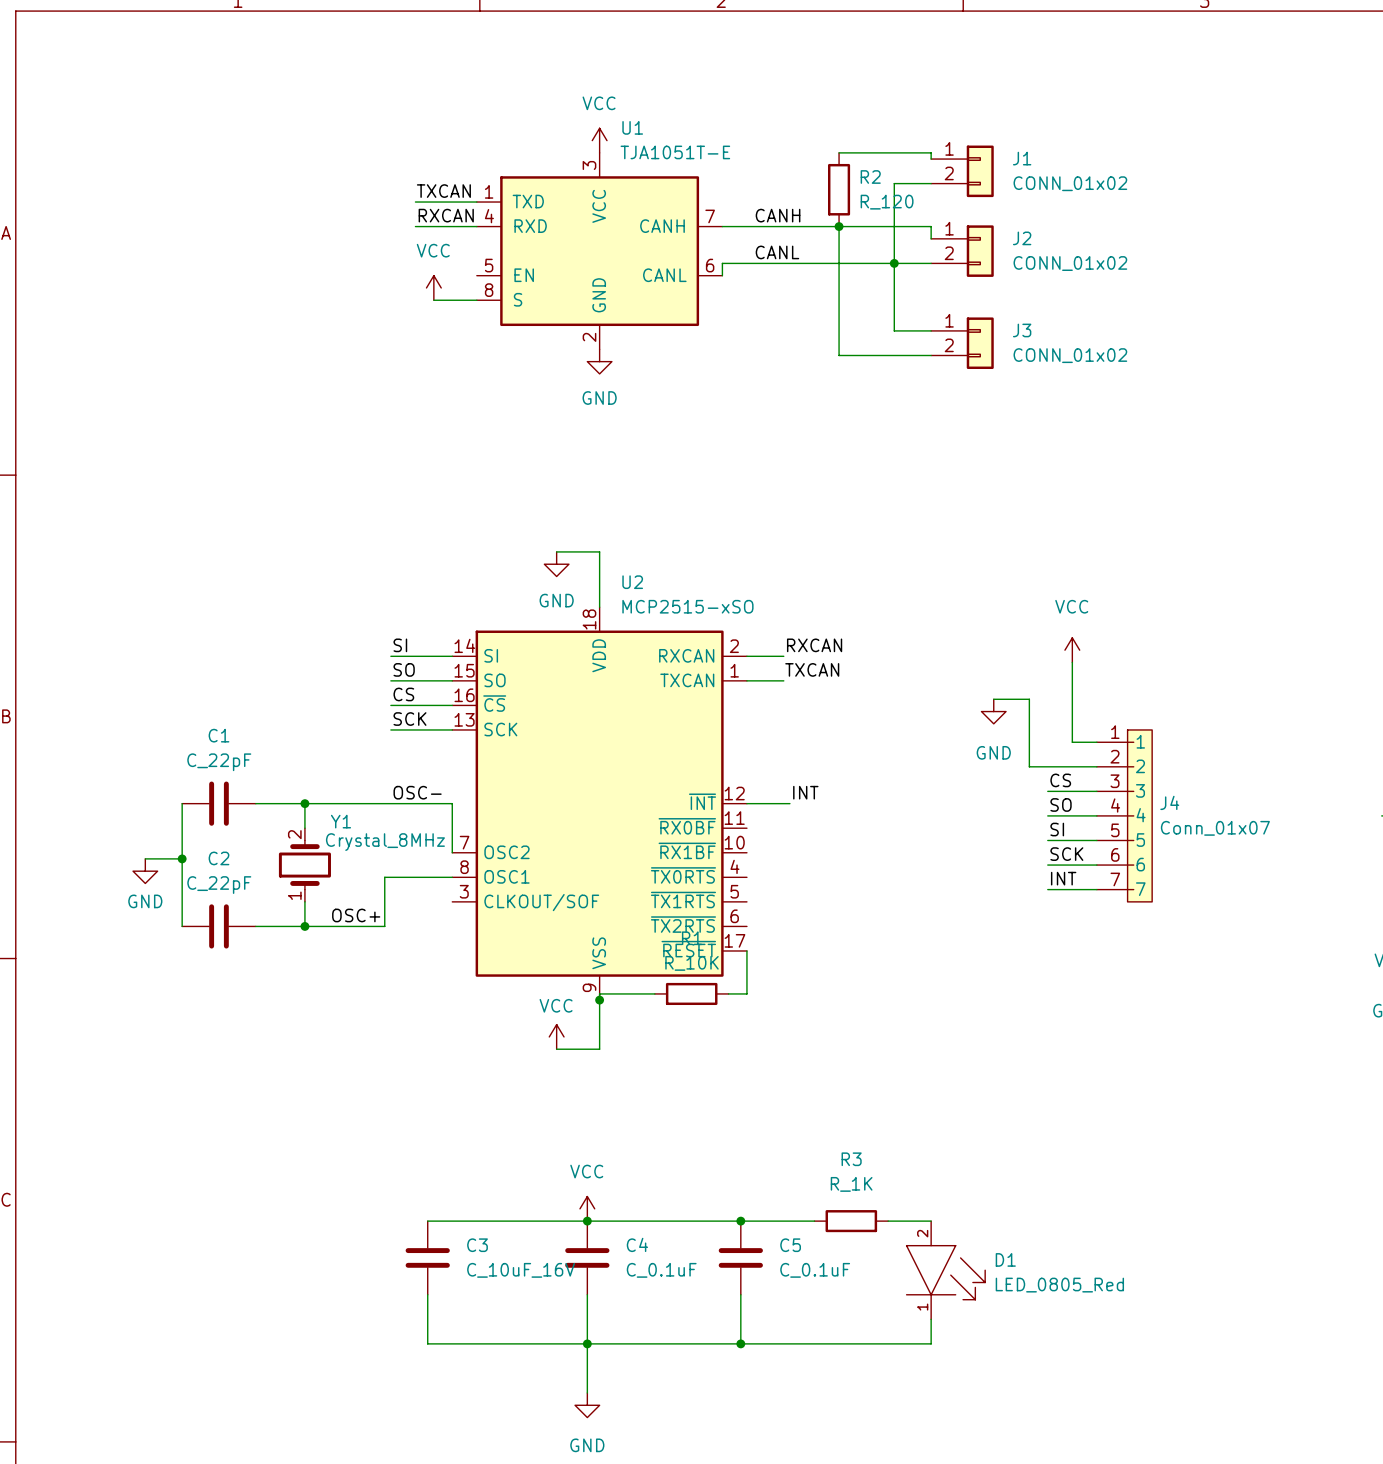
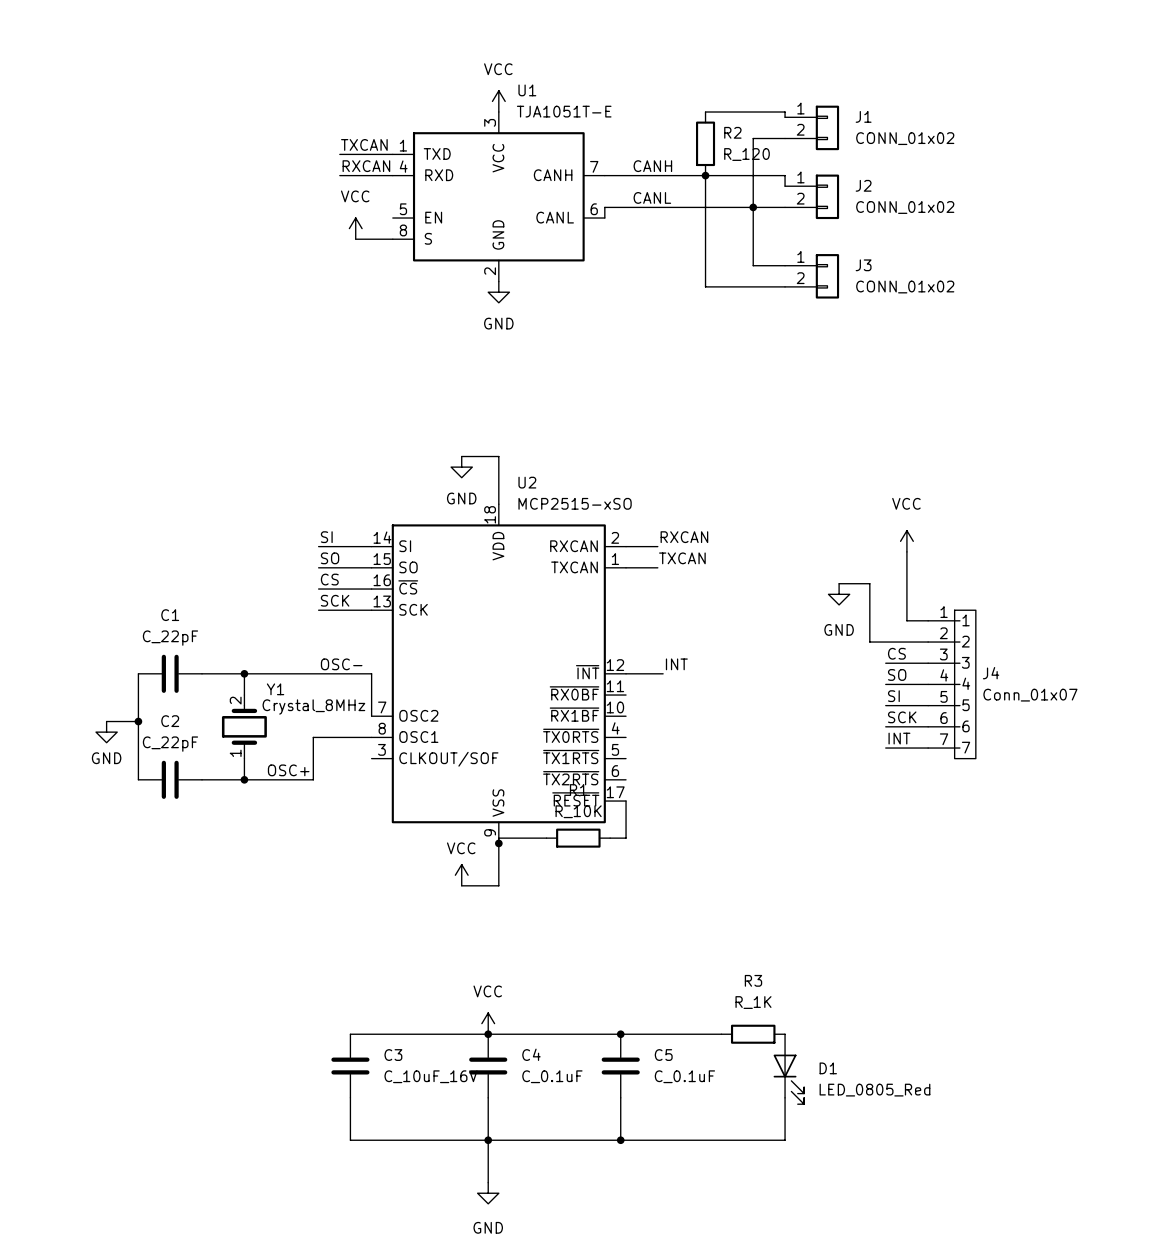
R3 position: (851, 1221) -> (753, 1034)
wire: (888, 1221) (931, 1221) -> (684, 1034) (721, 1034)
D1 symbol: [906, 1221, 986, 1320] -> [773, 1034, 805, 1105]

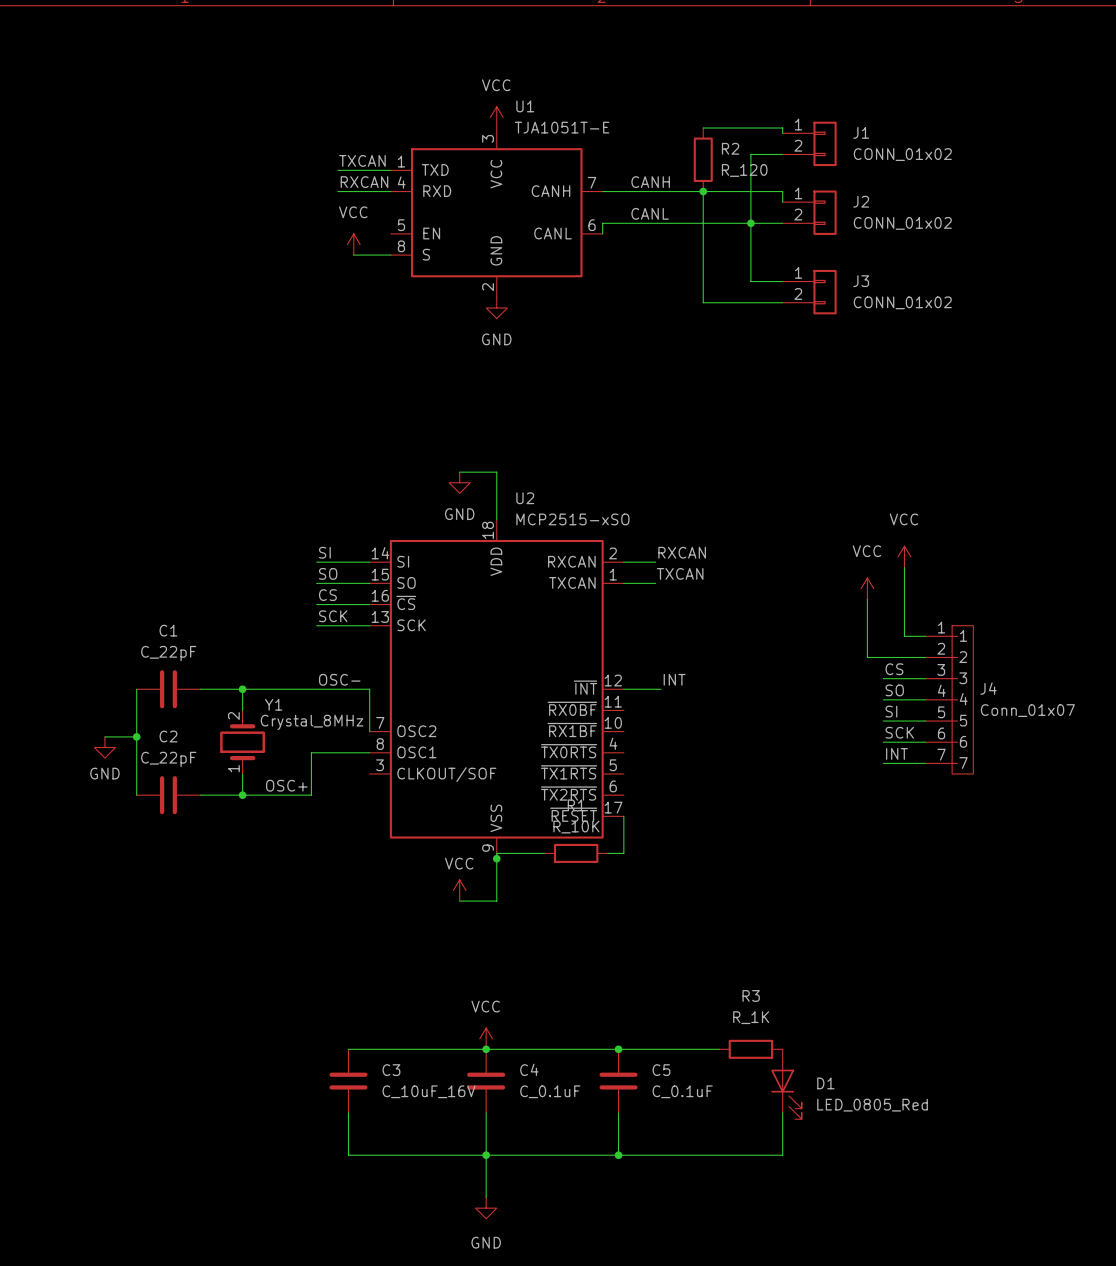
power symbol: none -> VCC (867, 588)
wire: (839, 583) (869, 583) -> none
power symbol: GND (839, 594) -> none

